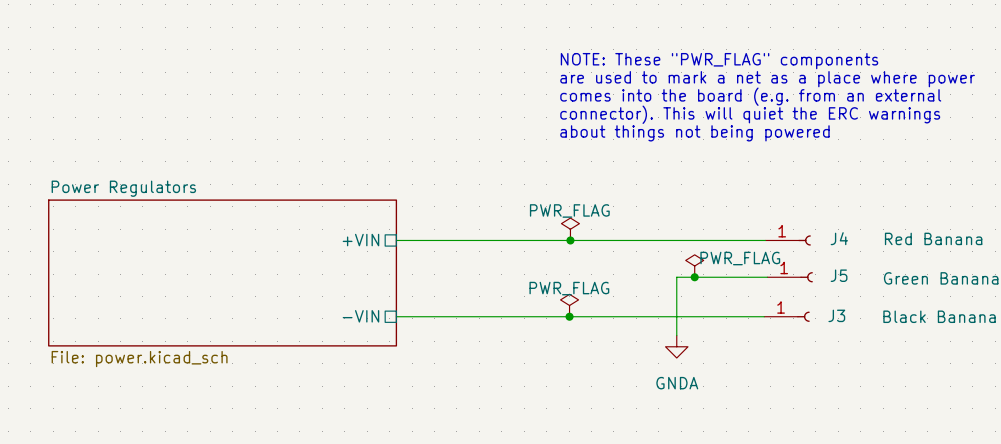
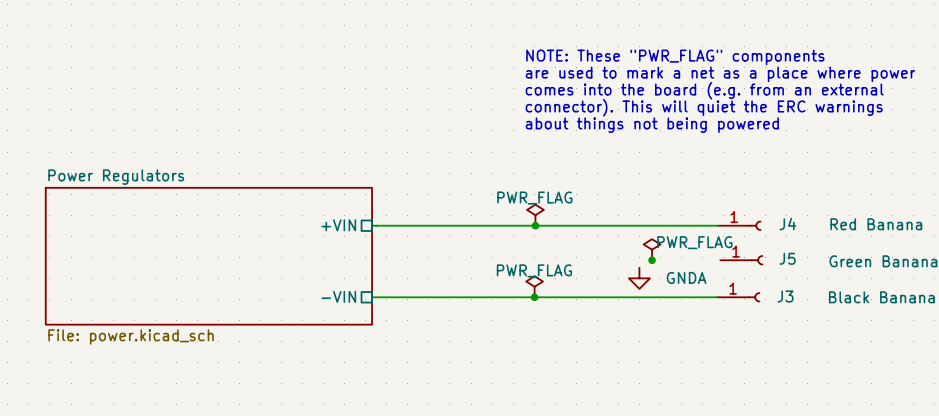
wire: (767, 277) (676, 277) (676, 335) -> none
power symbol position: GNDA (676, 346) -> GNDA (639, 278)
power symbol text position: GNDA (677, 383) -> GNDA (686, 277)

